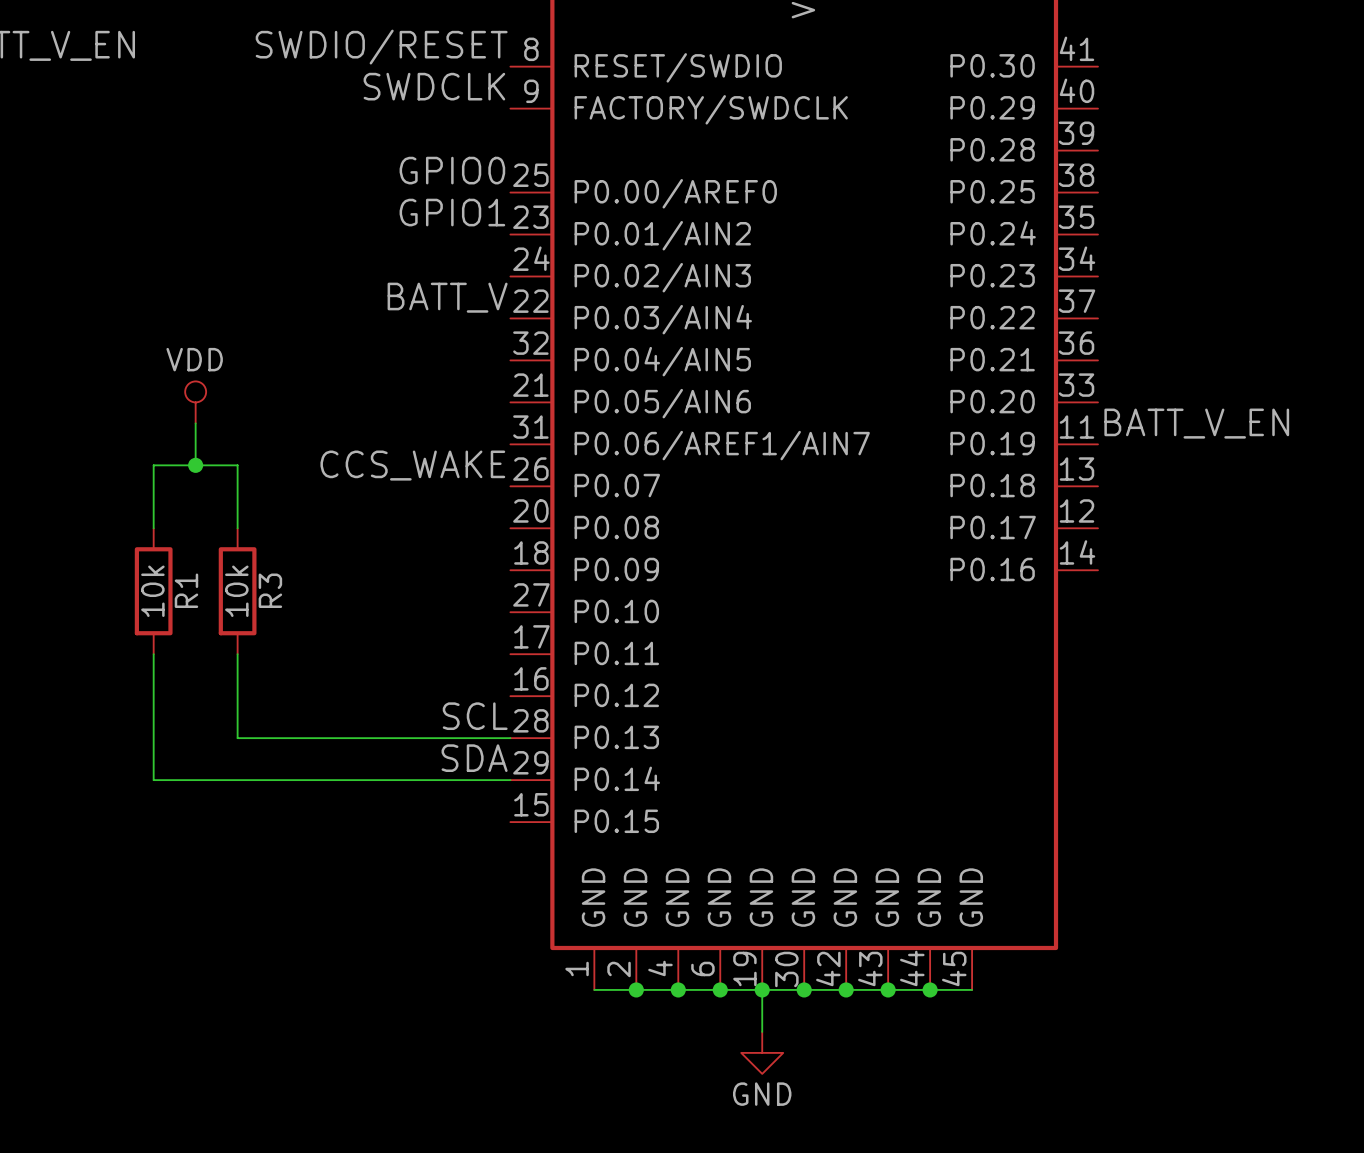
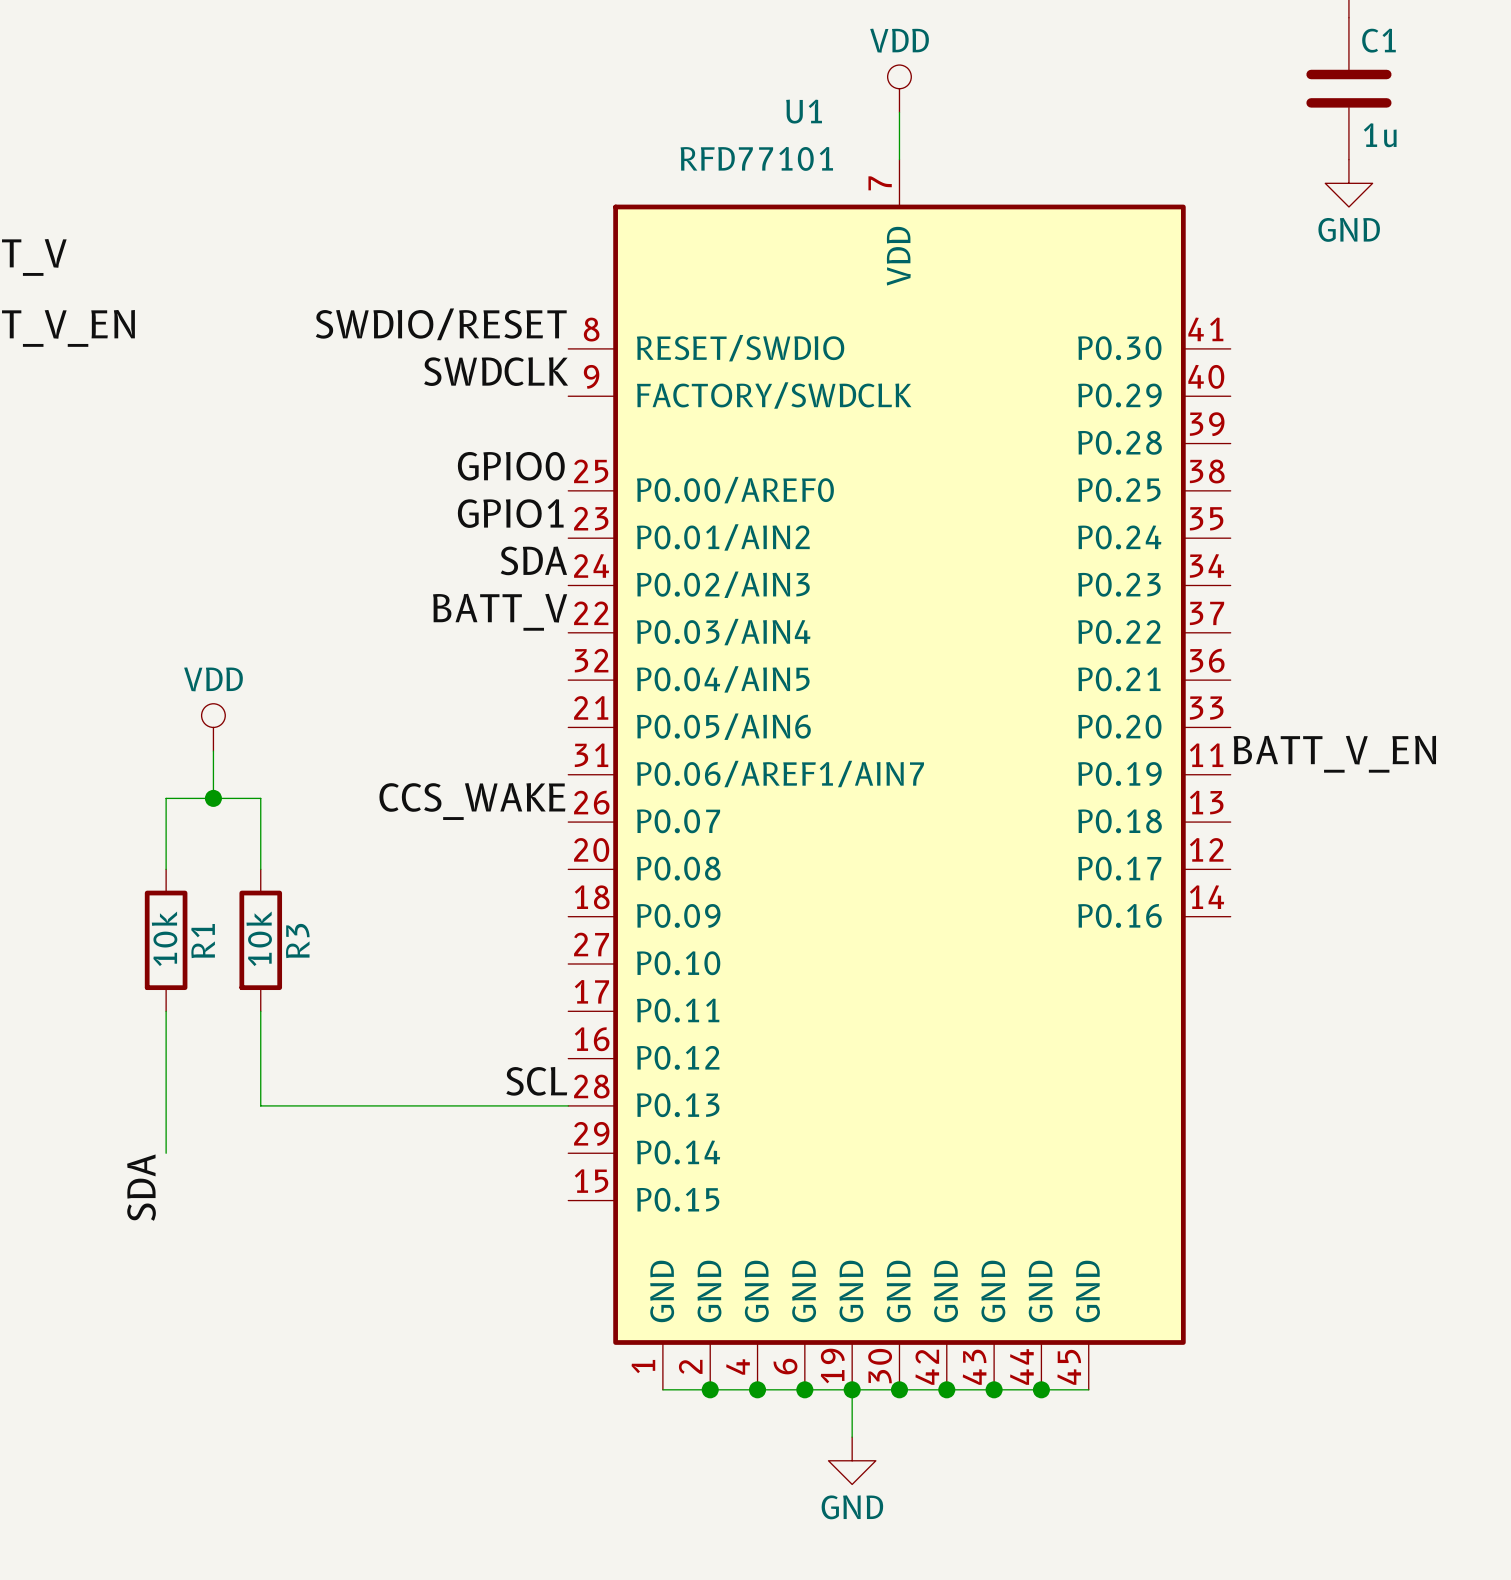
label: none -> SDA (533, 560)
label: SDA (474, 758) -> none
wire: (153, 780) (510, 780) -> none
label: none -> SDA (141, 1187)

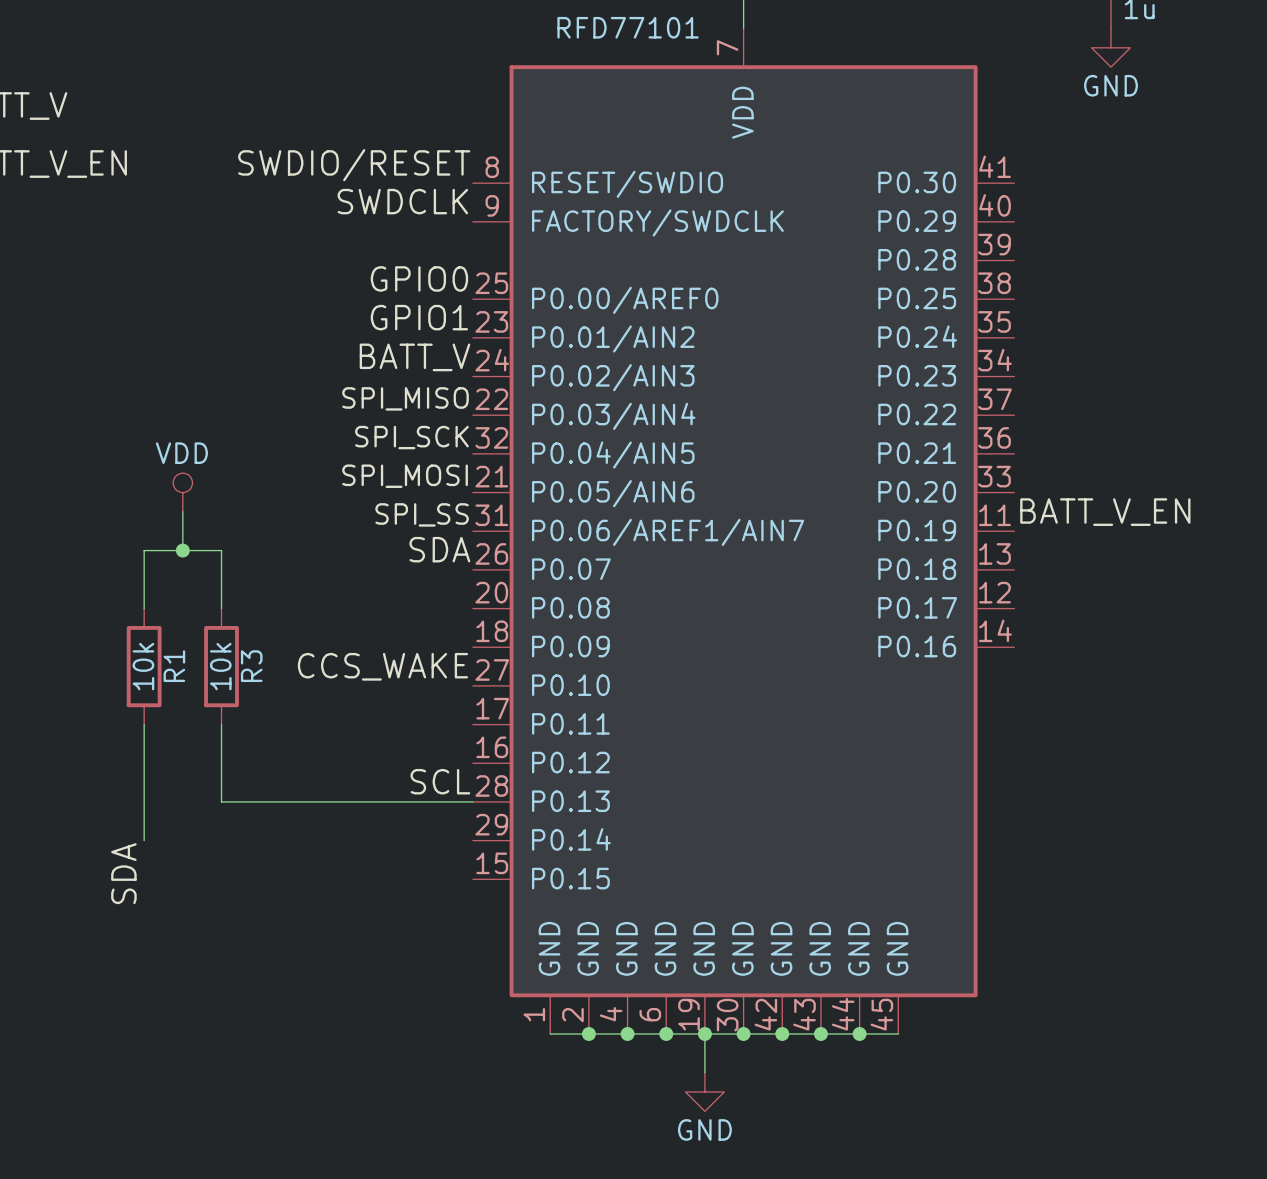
label: SDA (533, 560) -> BATT_V (415, 357)
label: BATT_V (500, 612) -> SPI_MISO (405, 398)
label: none -> SPI_SCK (411, 437)
label: none -> SPI_MOSI (405, 476)
label: none -> SPI_SS (422, 514)
label: CCS_WAKE (472, 801) -> SDA (439, 549)
label: none -> CCS_WAKE (382, 666)

